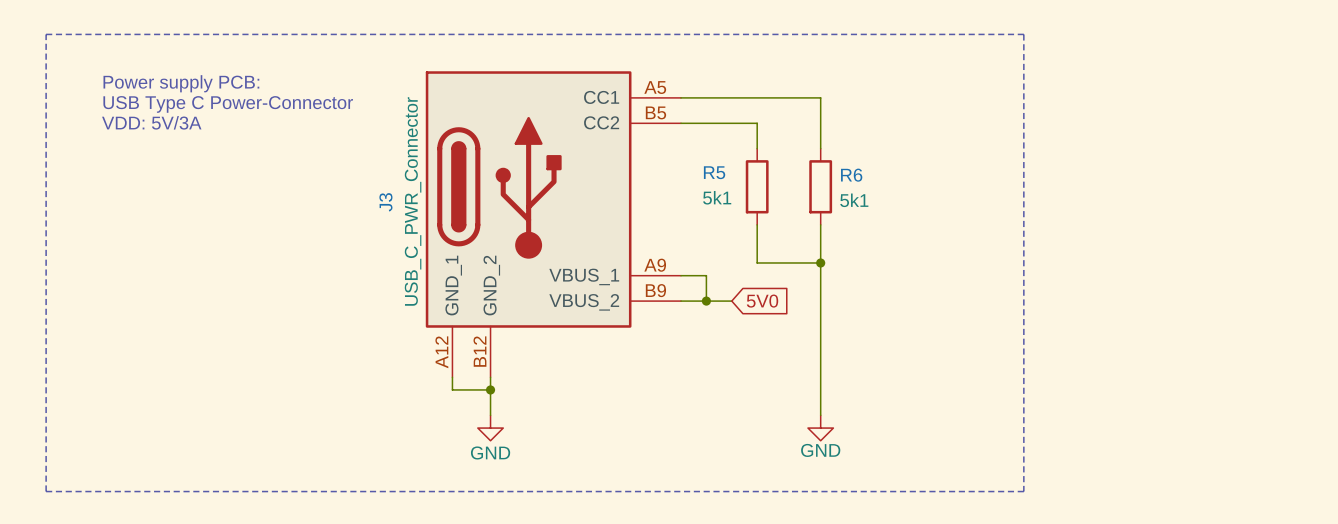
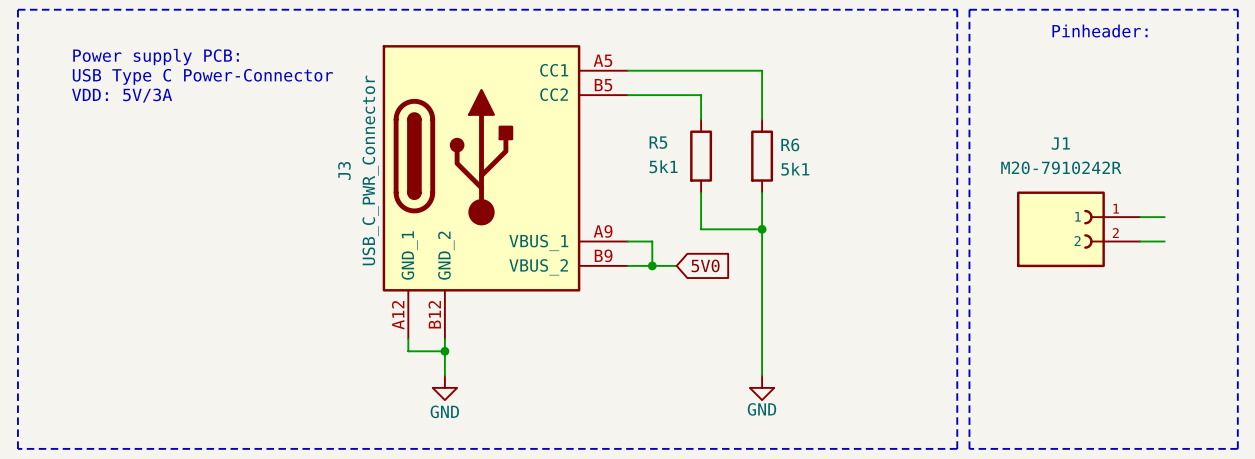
line: none -> (969, 9) (1237, 9) (1237, 448) (969, 448) (969, 9)
text: none -> Pinheader: (1100, 31)
wire: none -> (1140, 217) (1164, 217)
J1: none -> M20-7910242R (1078, 229)
wire: none -> (1140, 241) (1164, 241)

